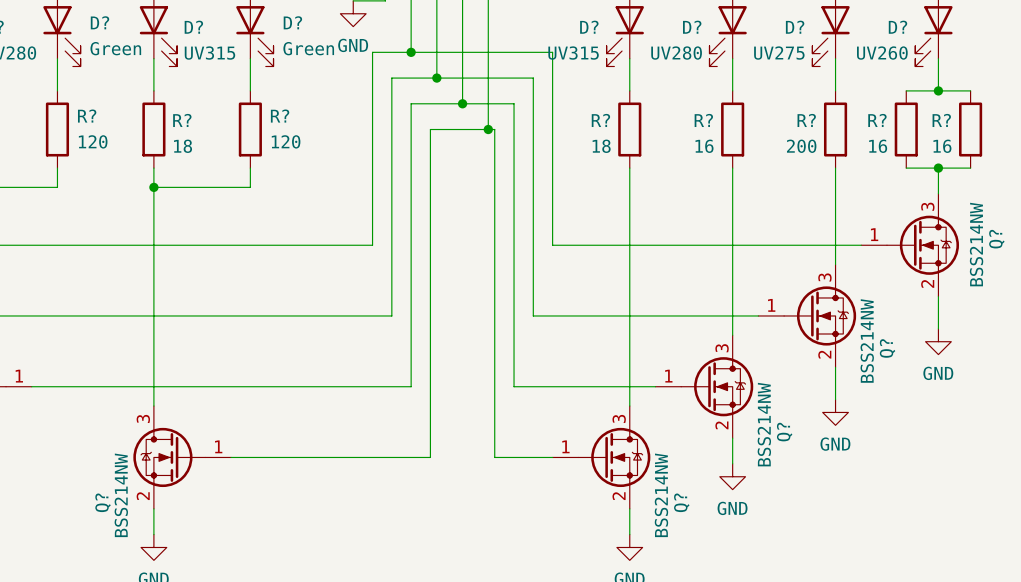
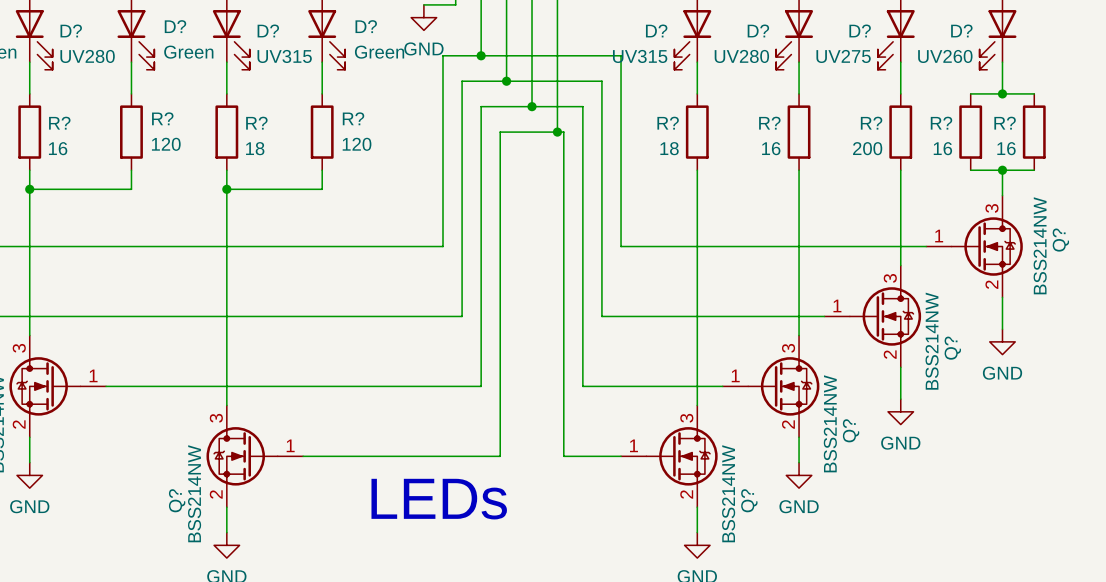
text: none -> LEDs (439, 499)

